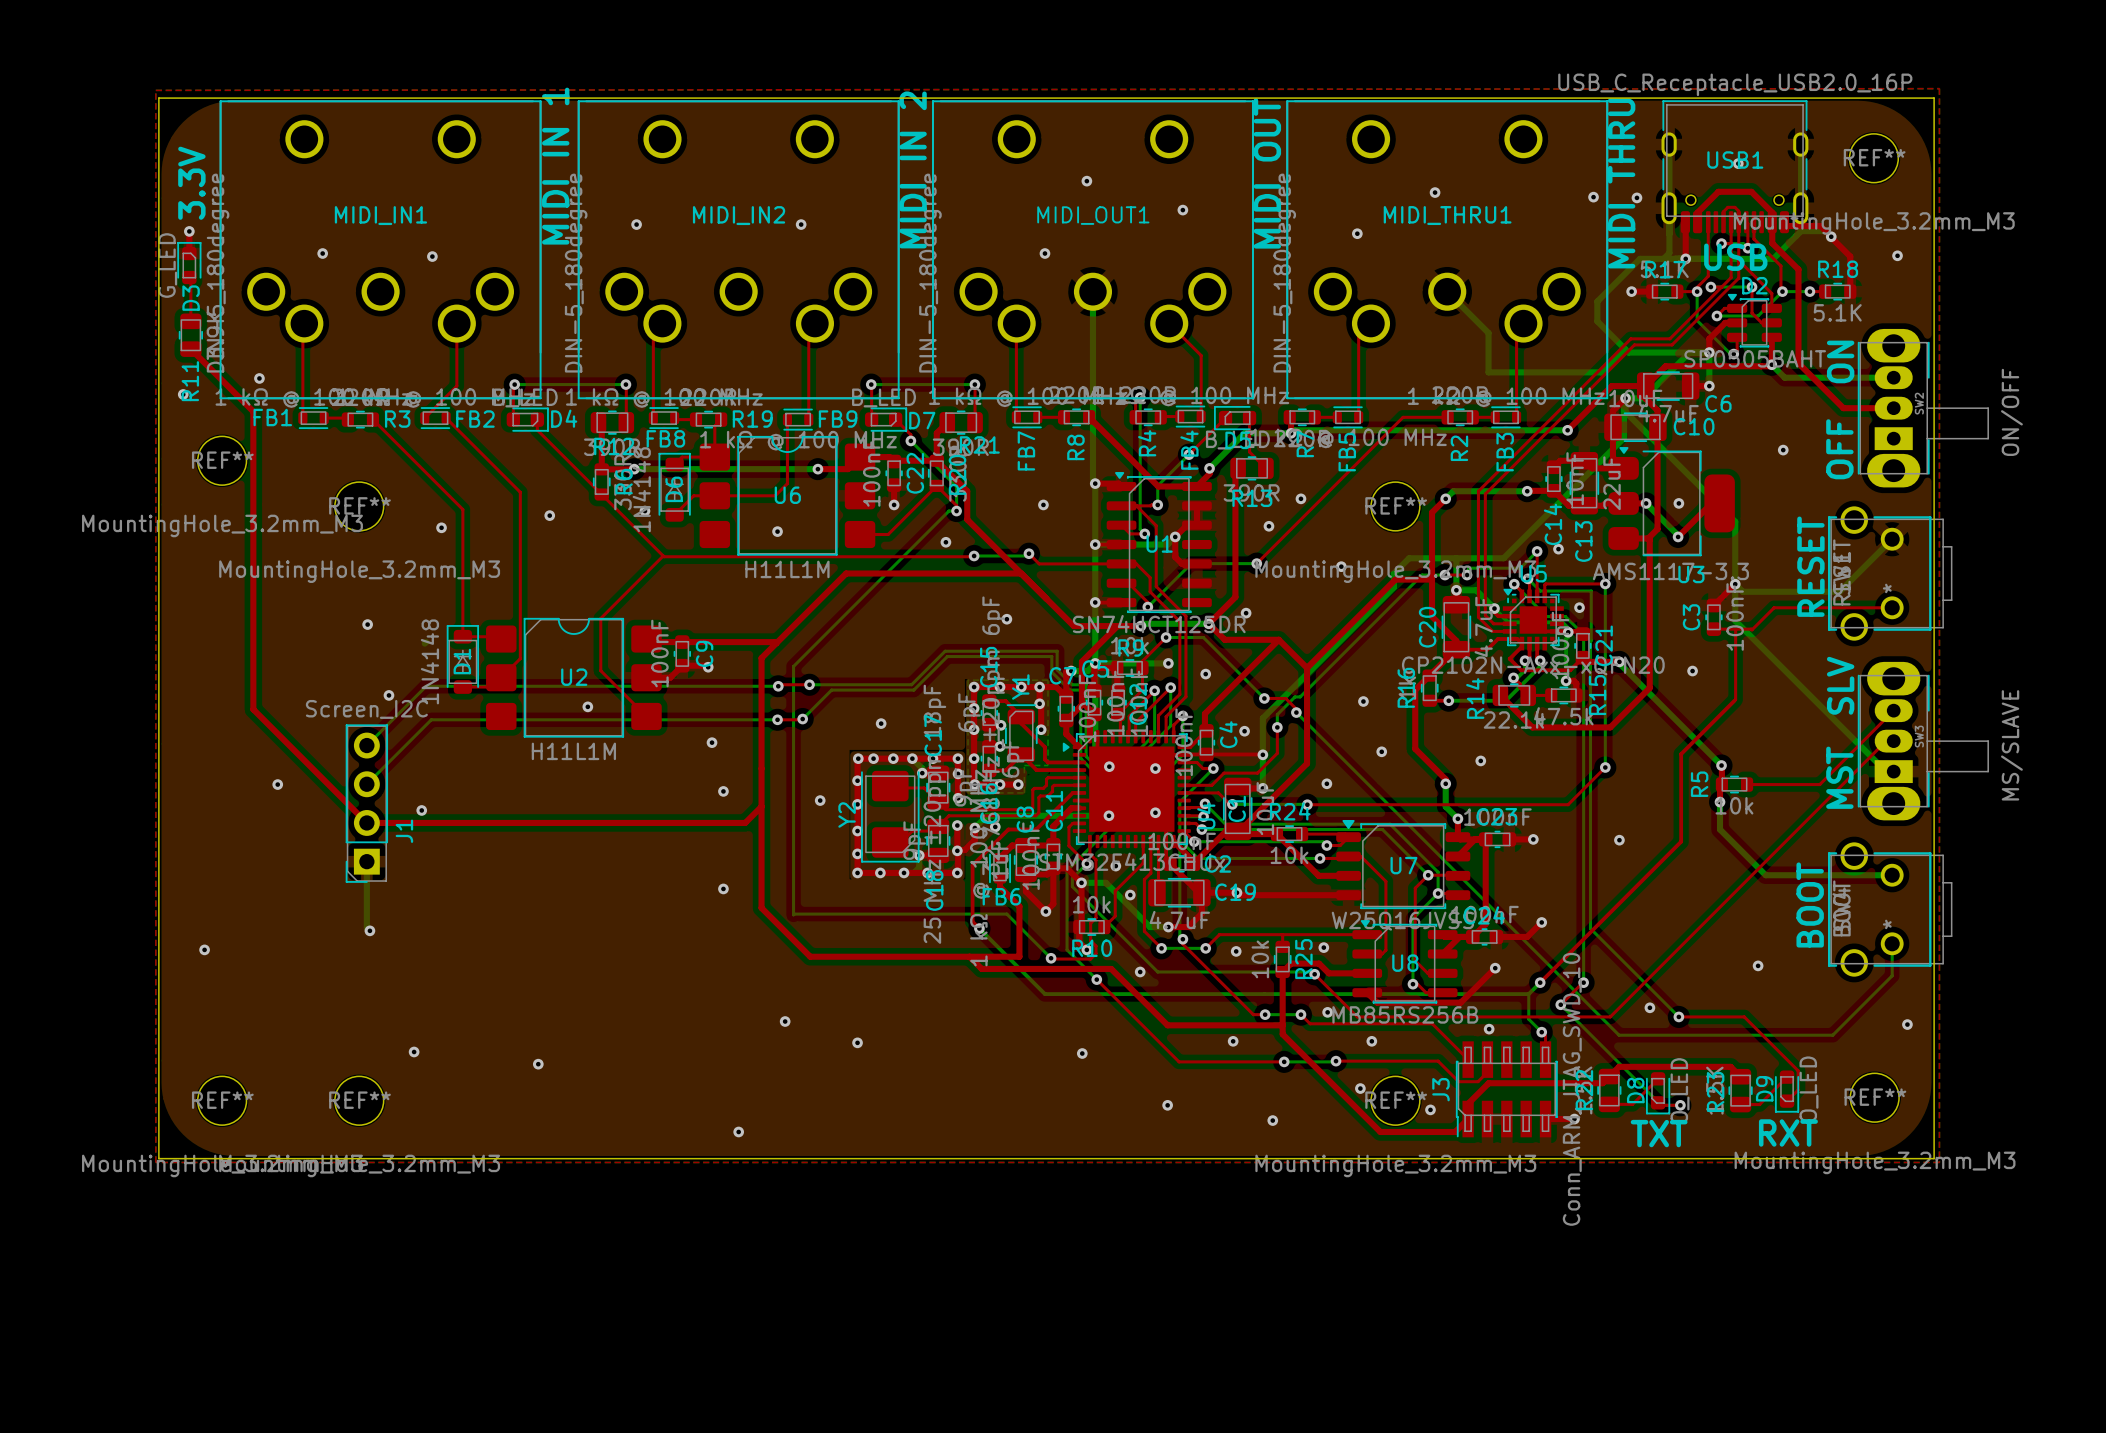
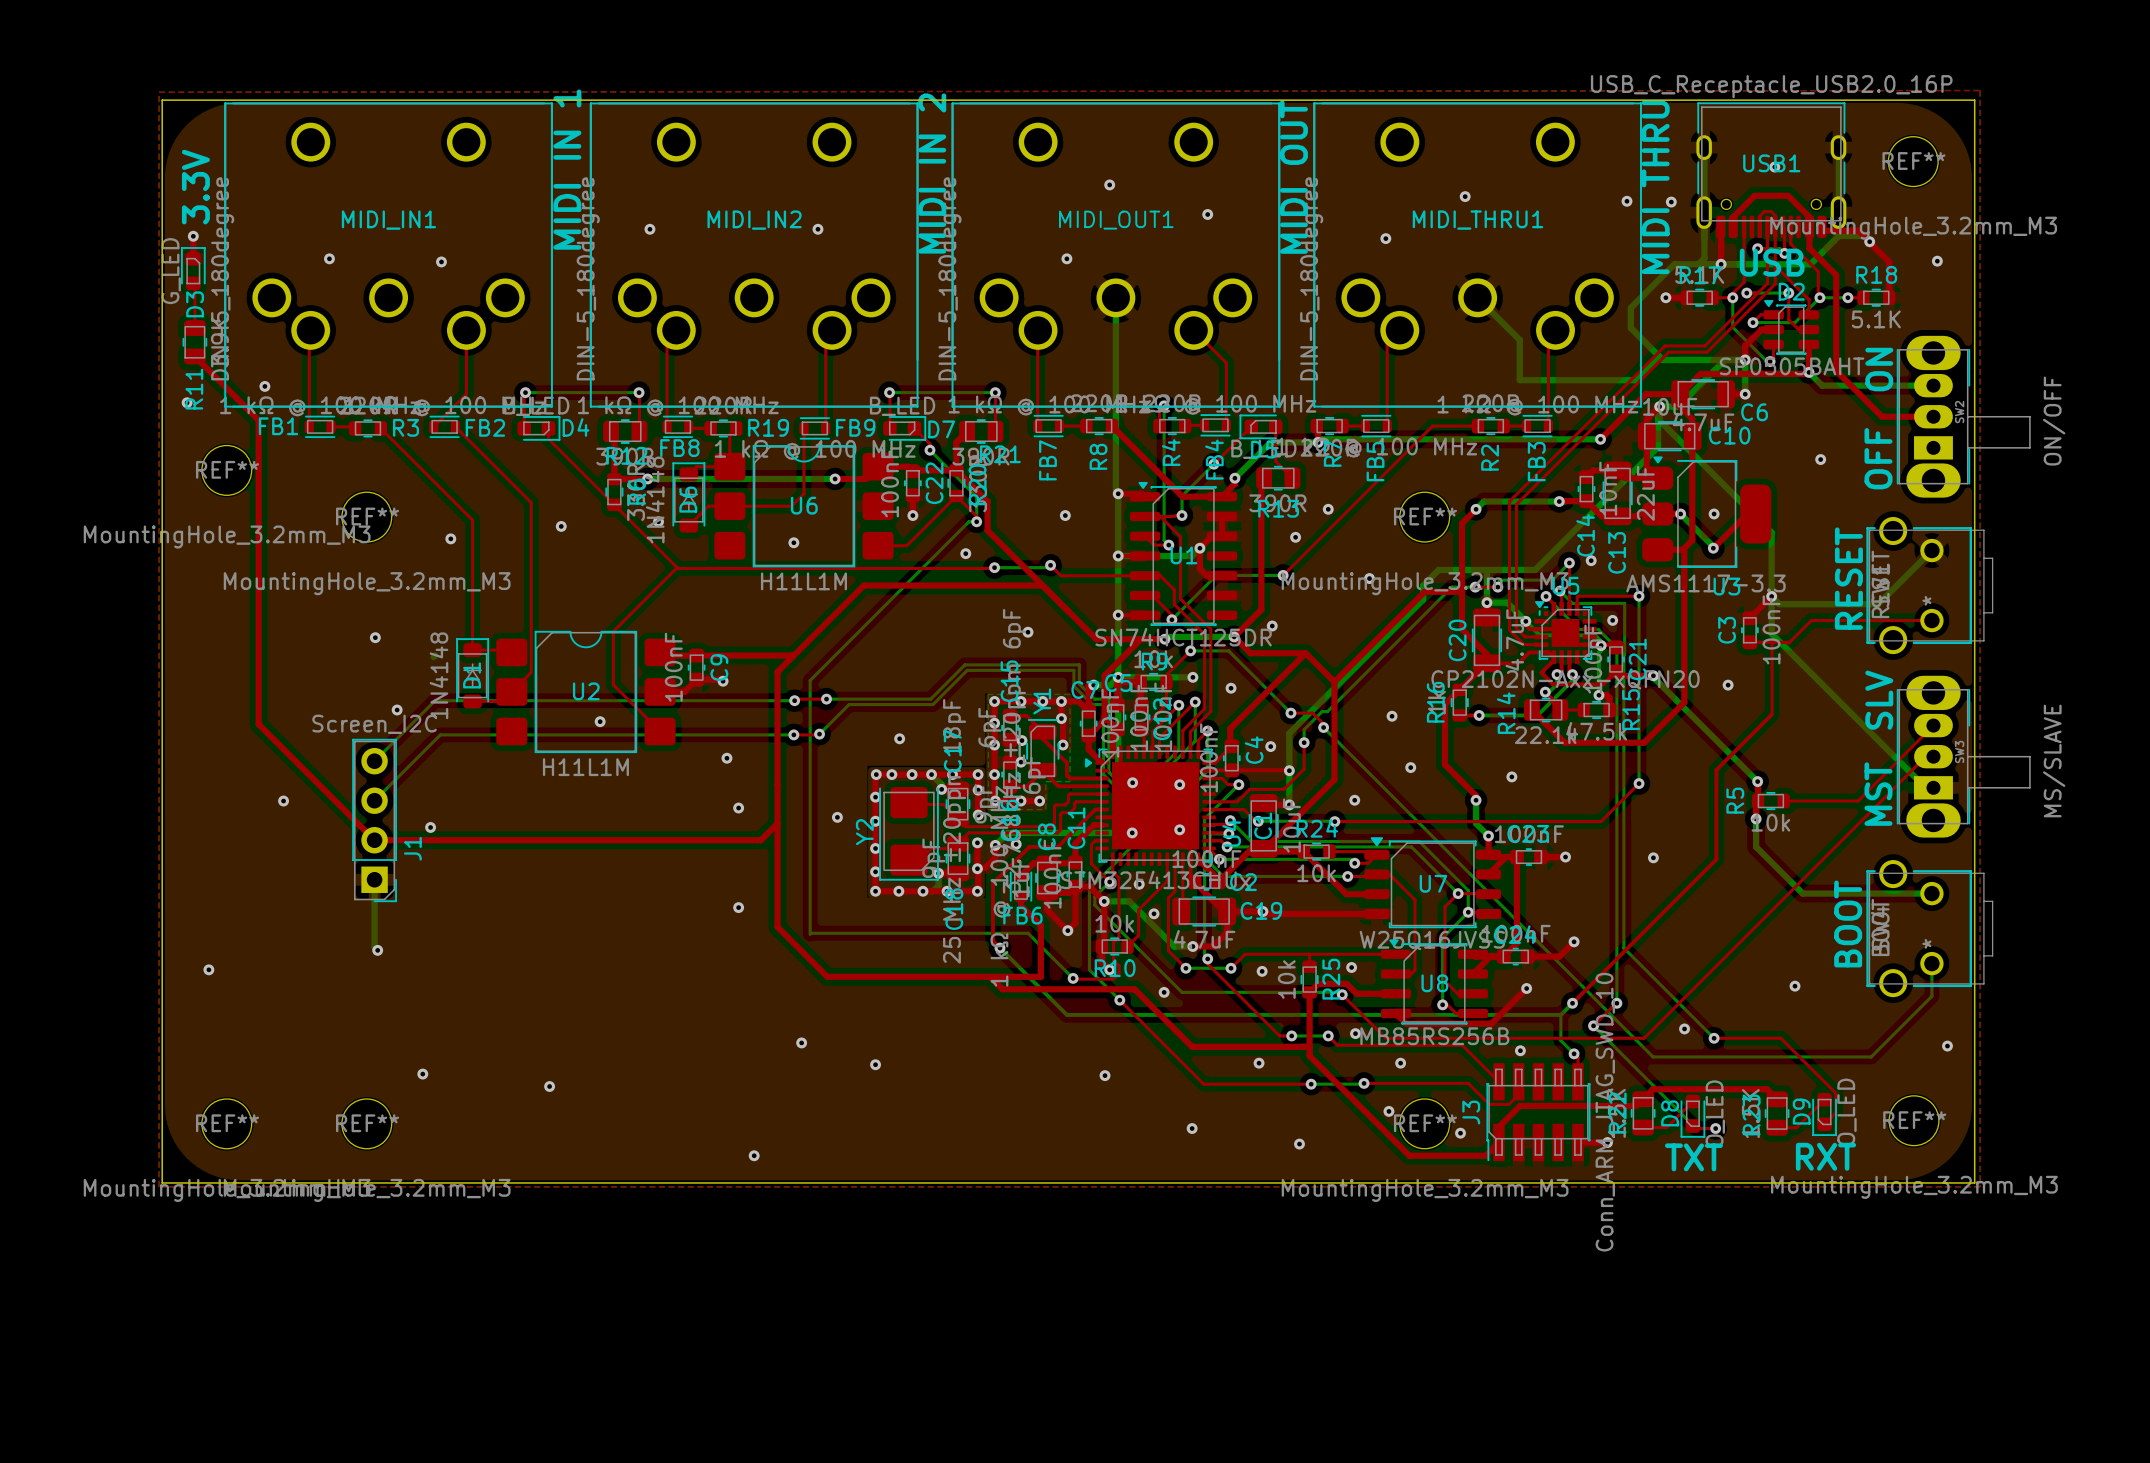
J1 footprint: [345, 724, 389, 883] -> [352, 738, 397, 903]

